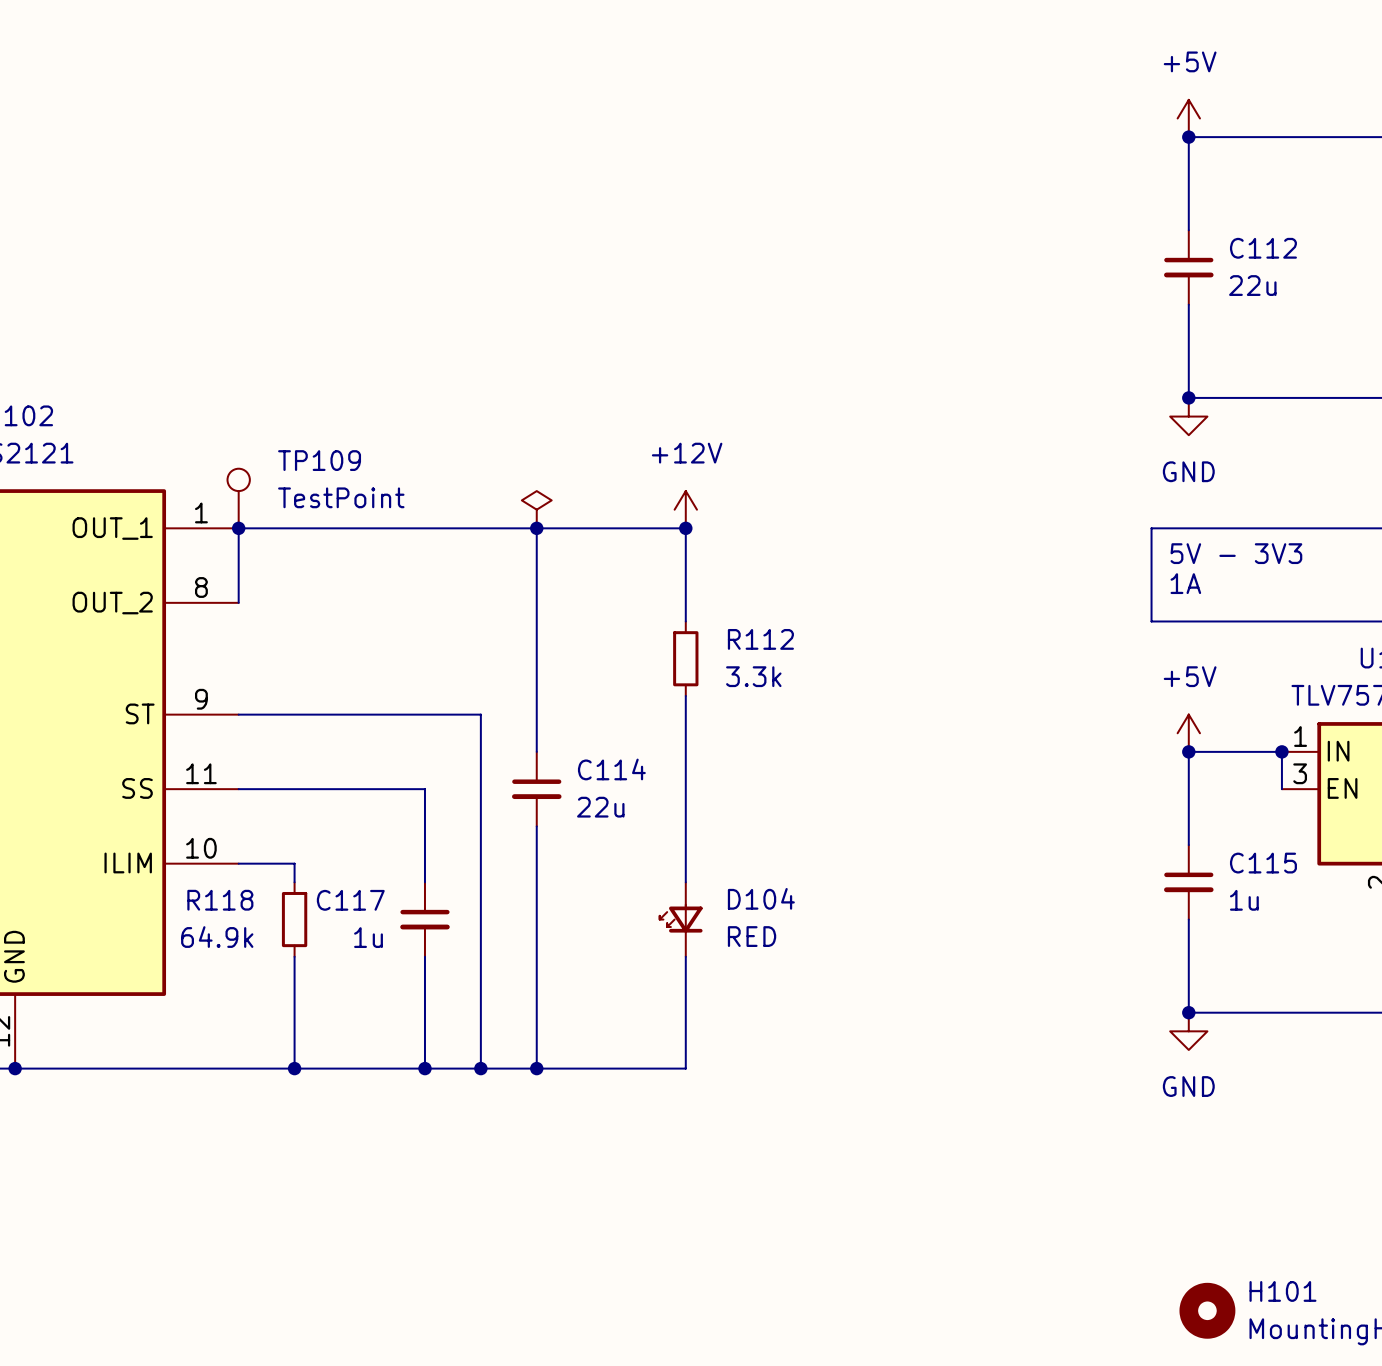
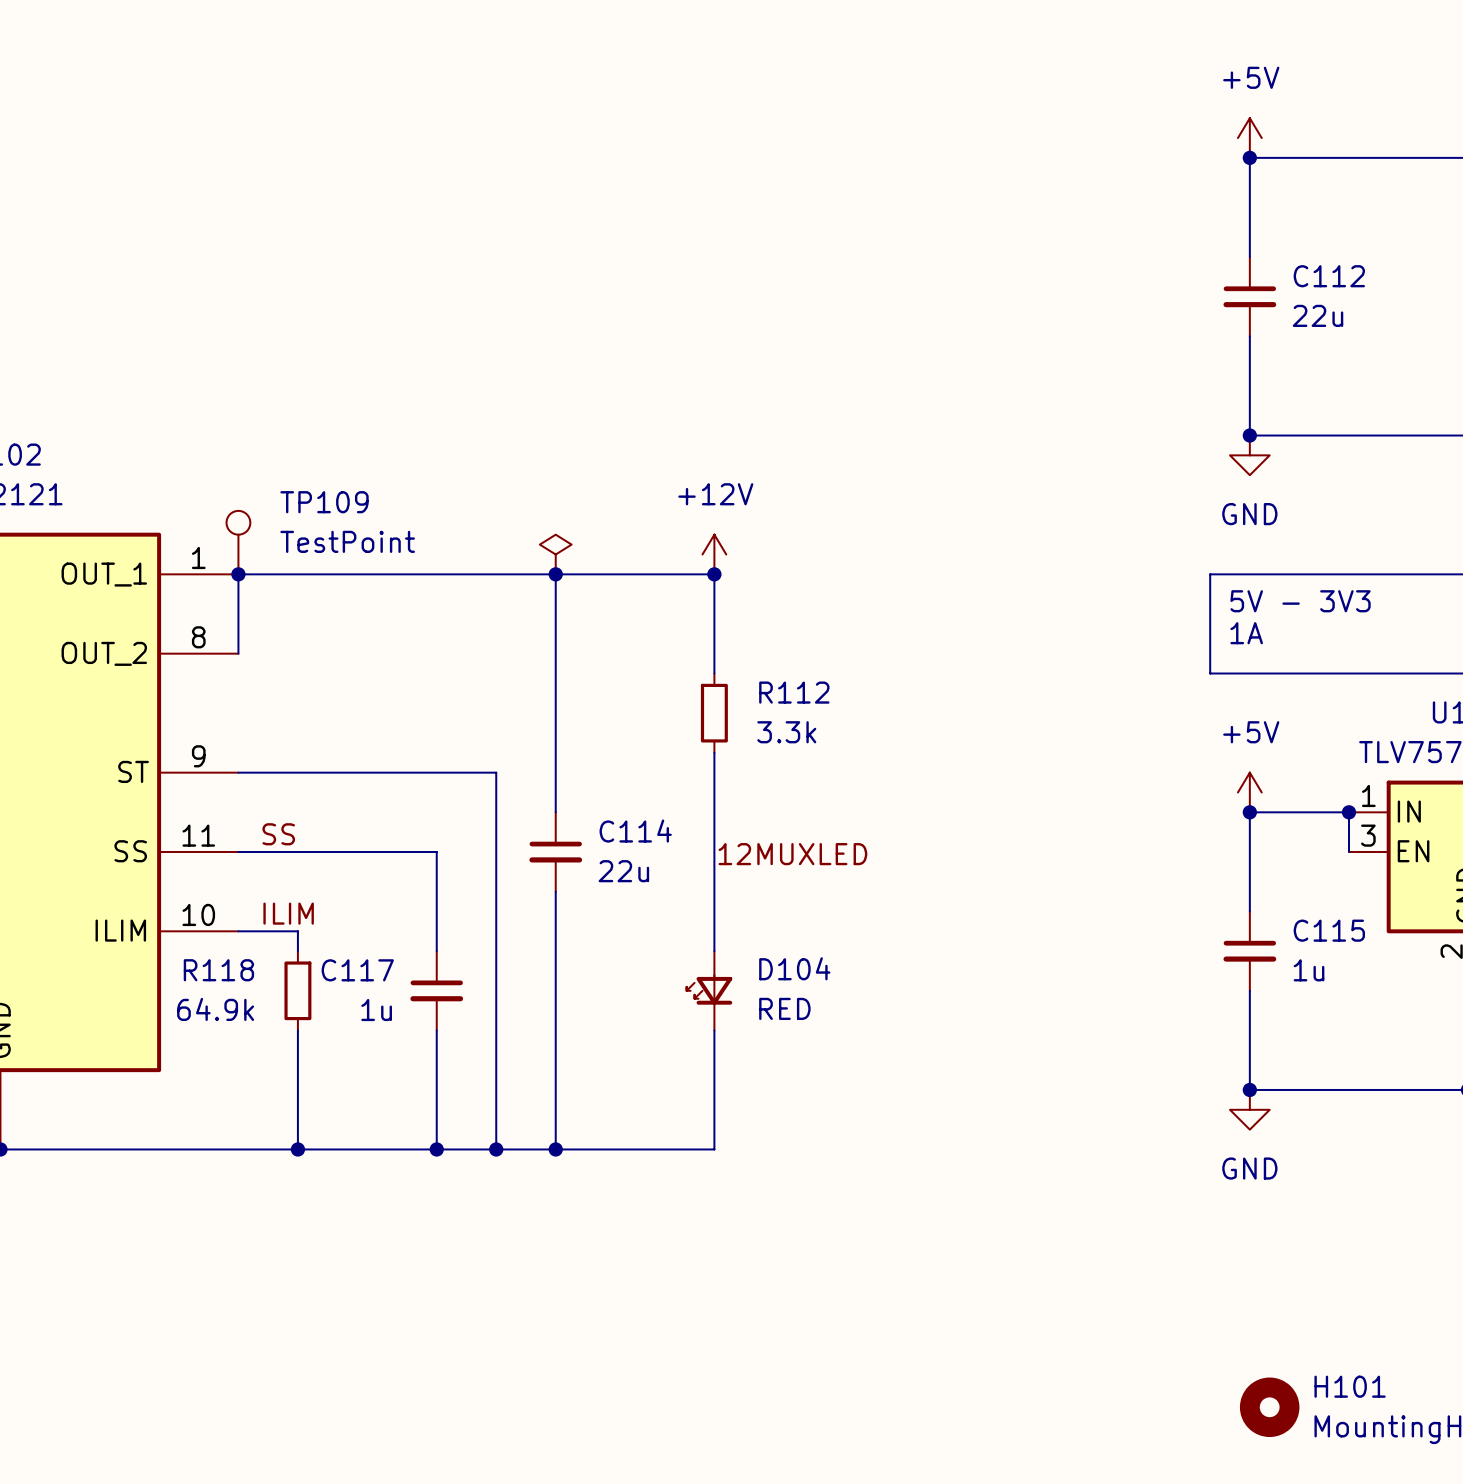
label: none -> SS (278, 834)
label: none -> 12MUXLED (792, 854)
label: none -> ILIM (288, 913)

